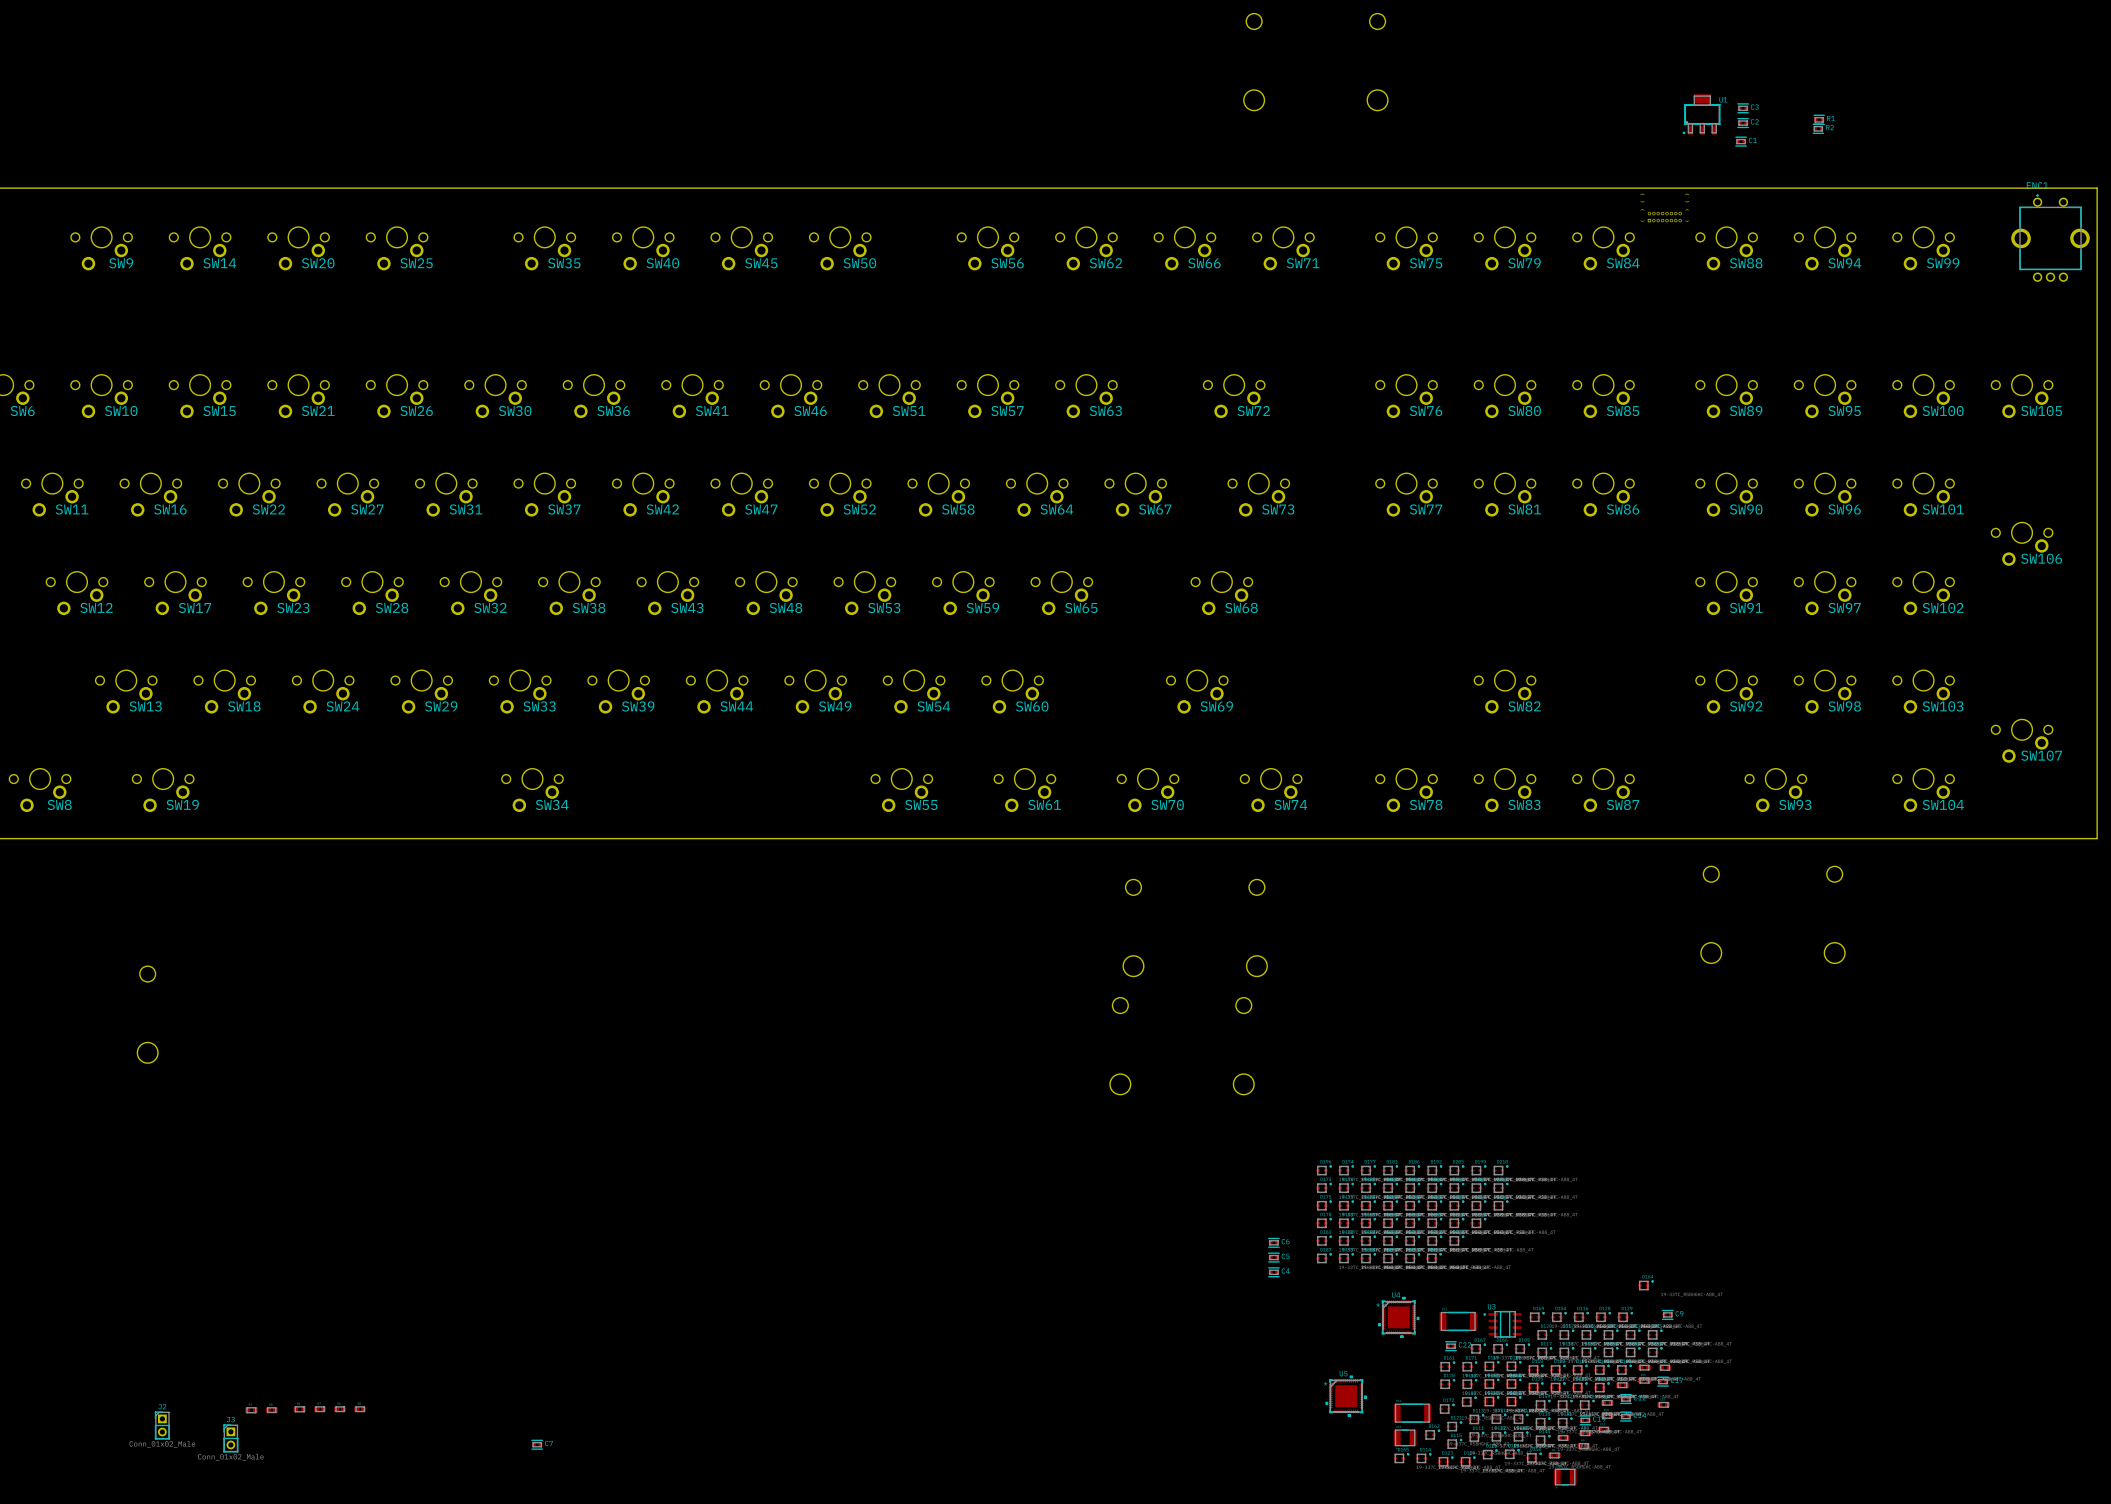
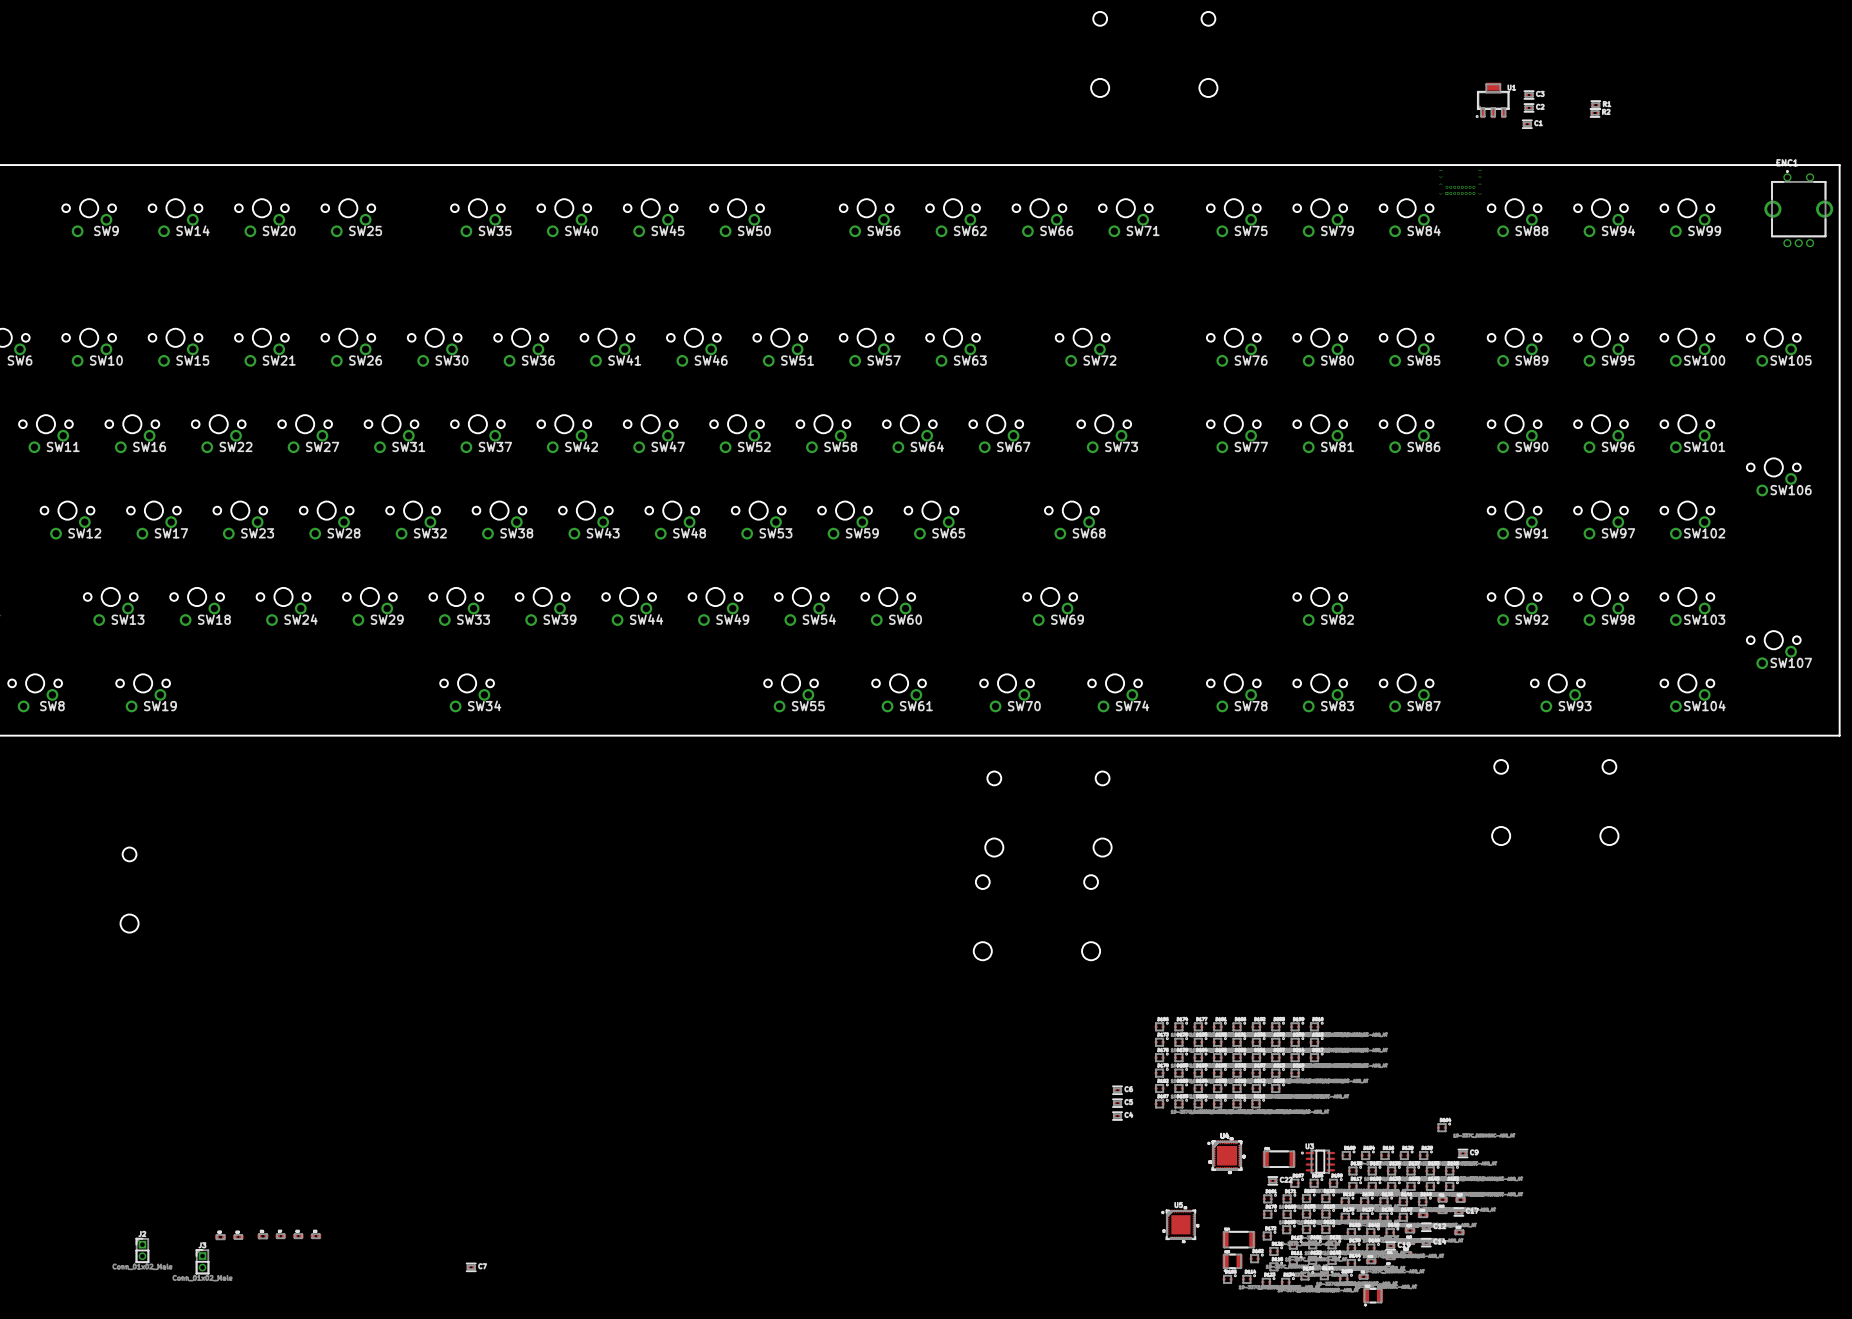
part: none -> (1226, 1155)

